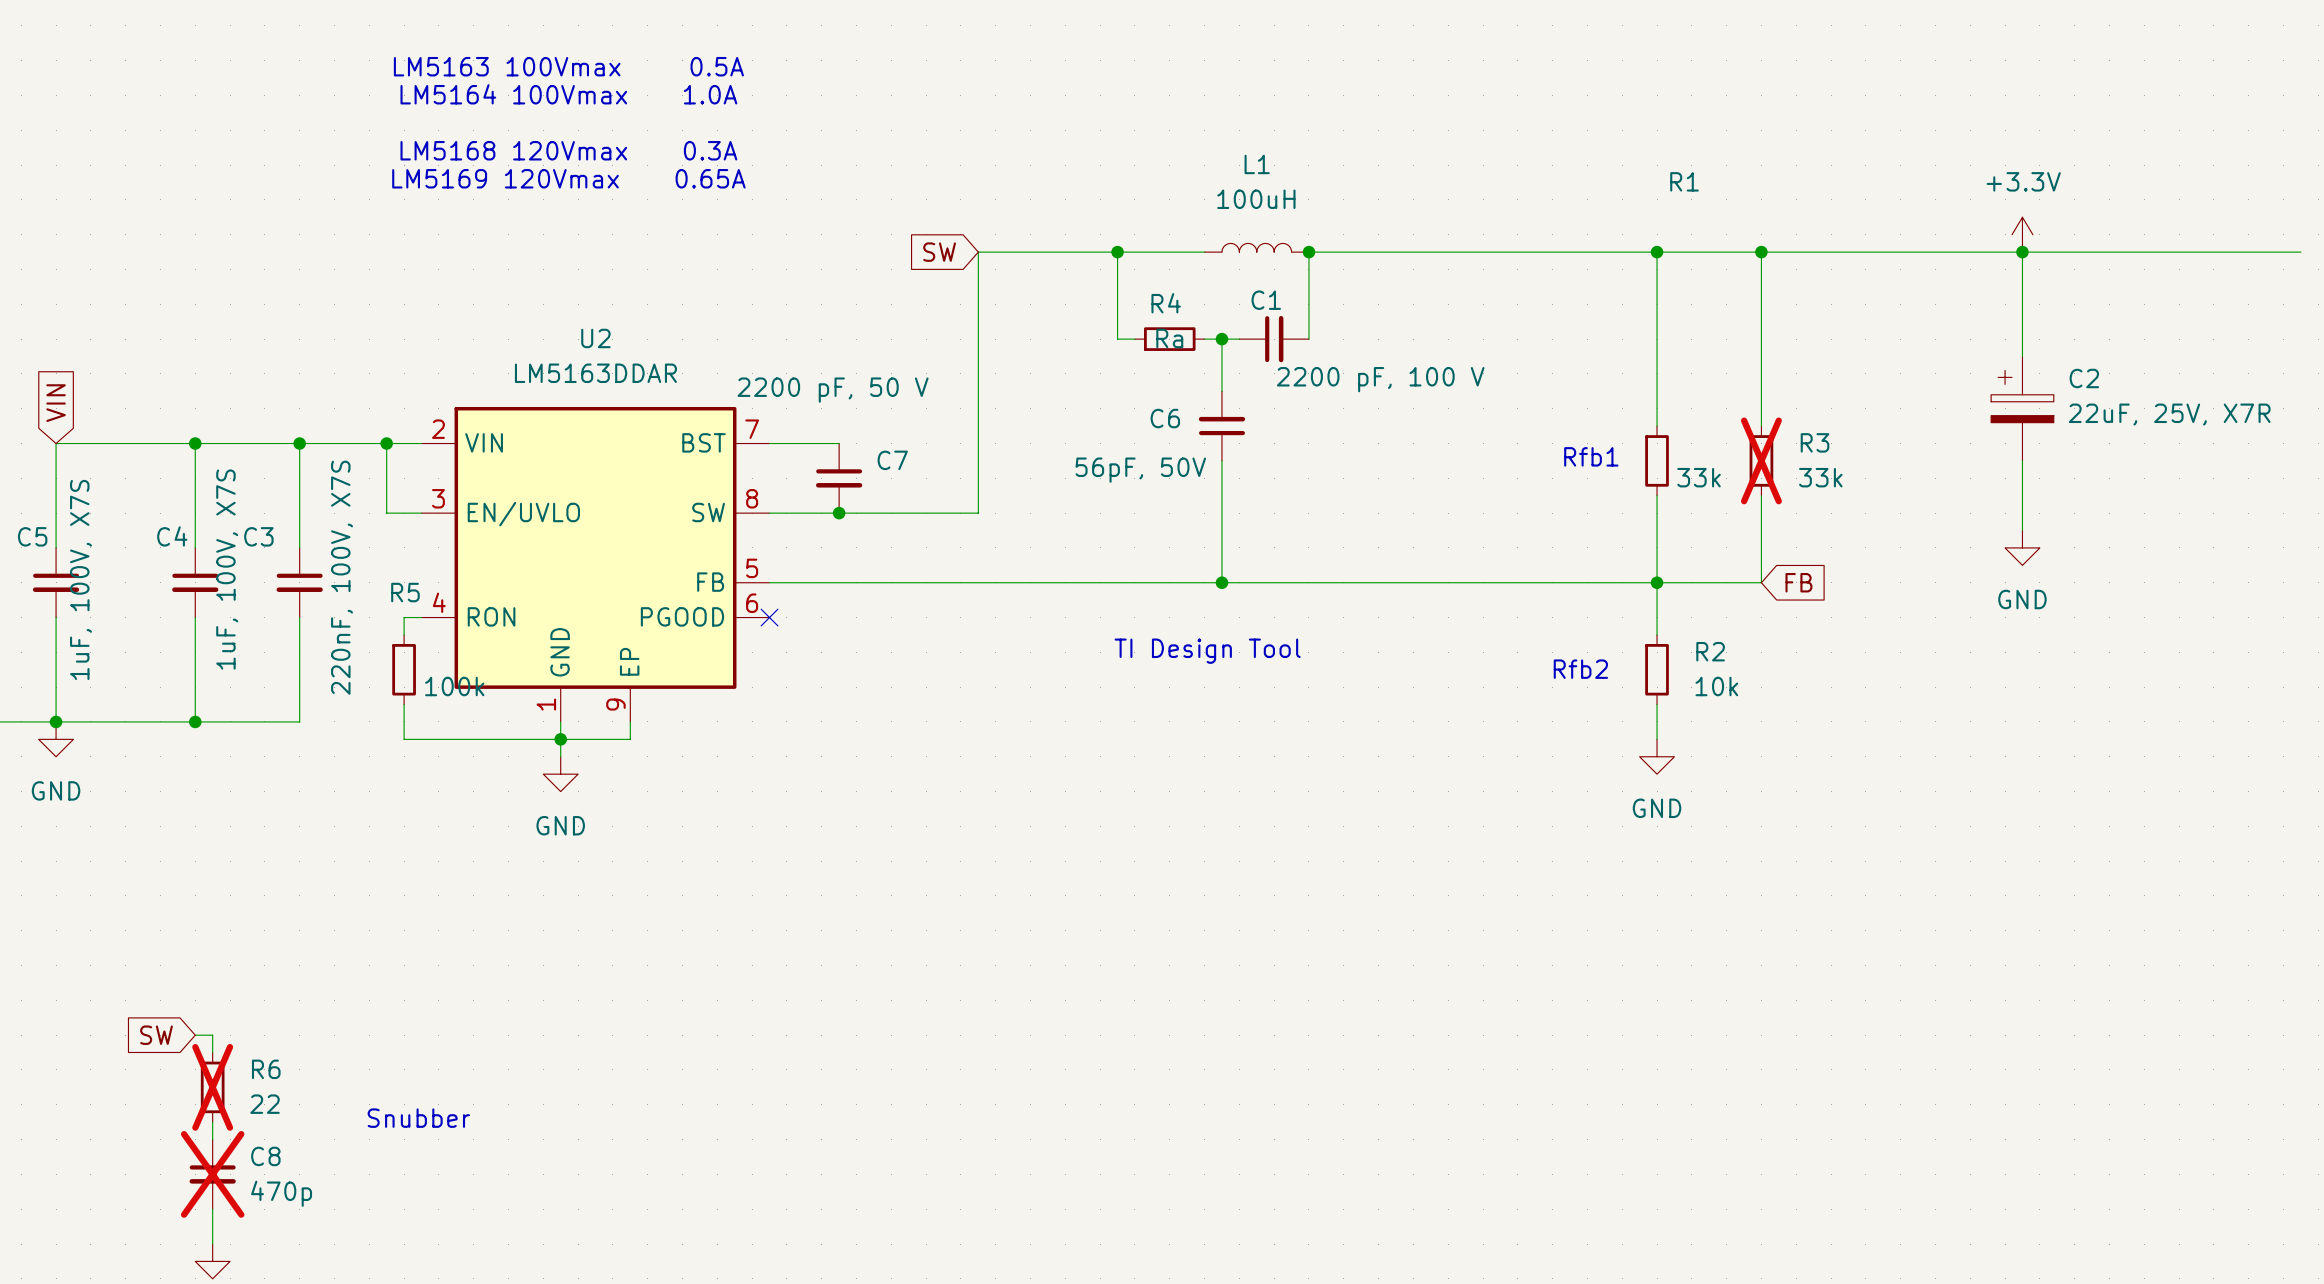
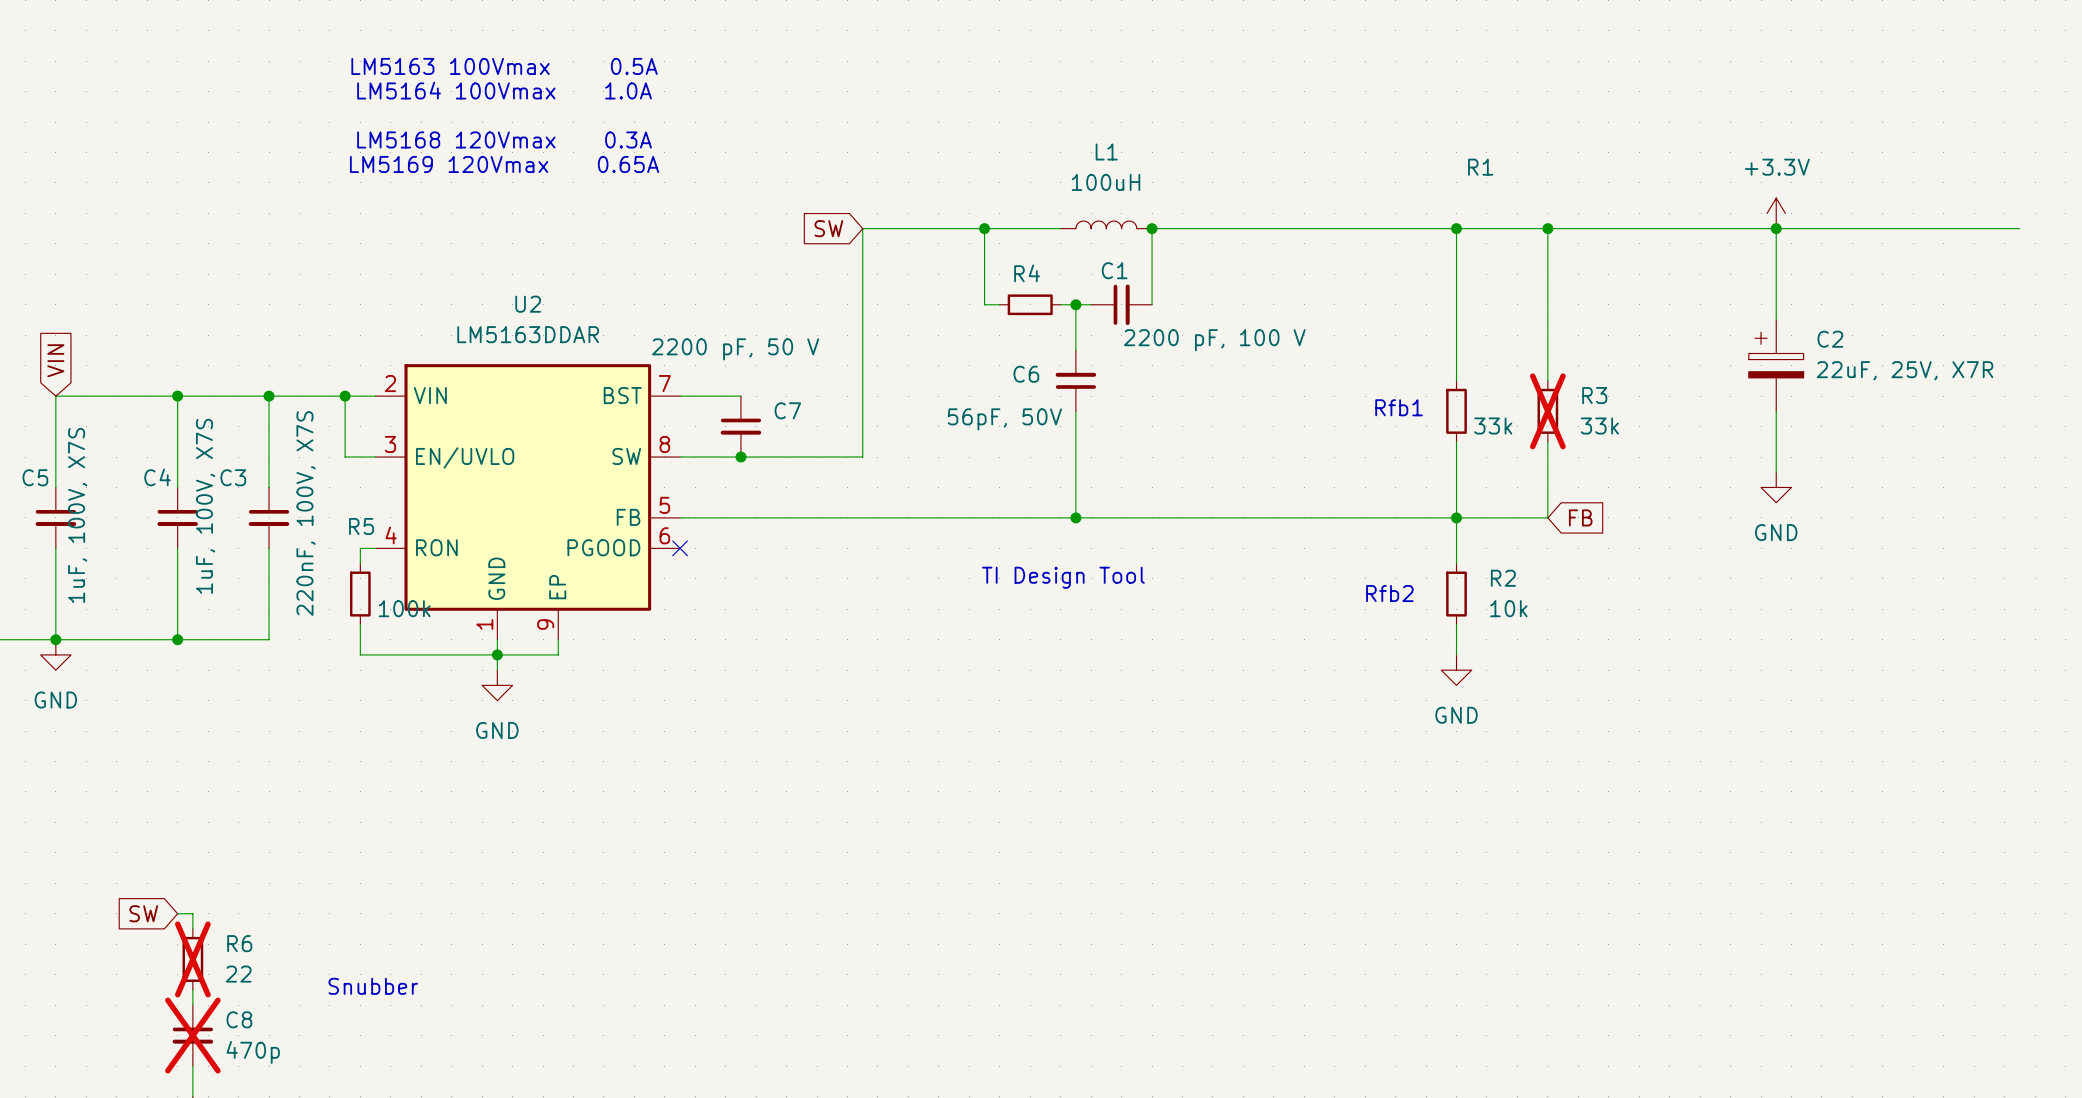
R4 text: Ra (1169, 338) -> none

